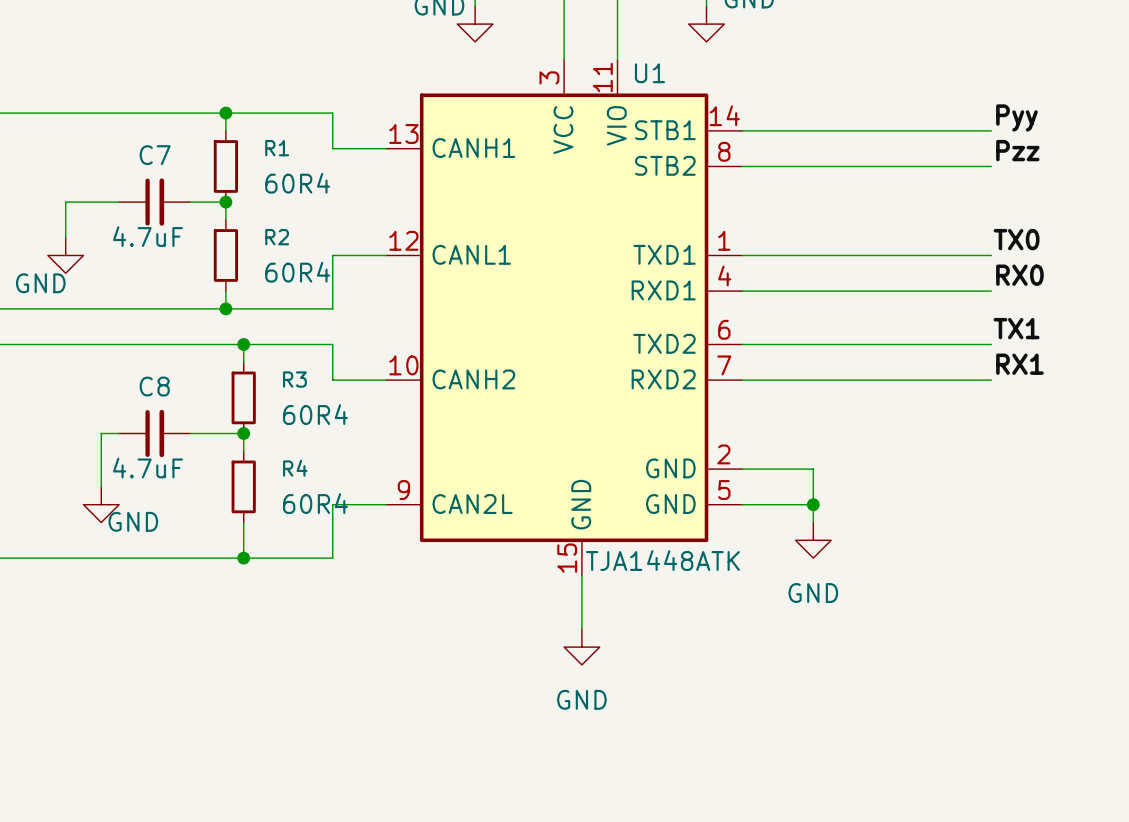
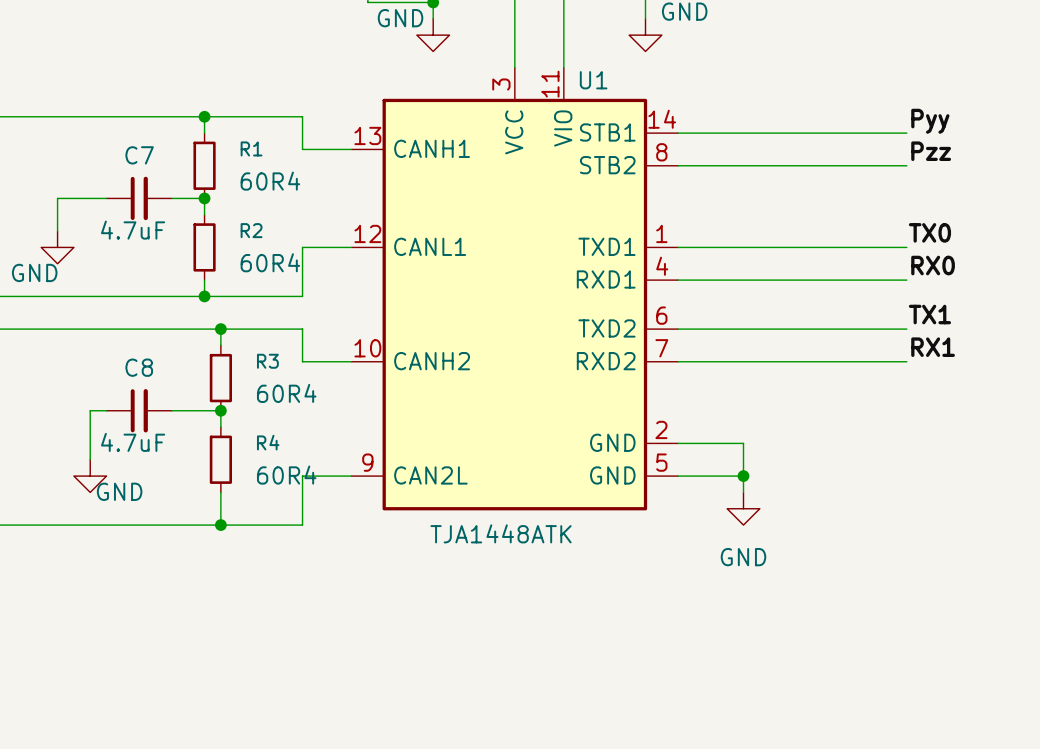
U1 symbol: [386, 59, 743, 576] -> [351, 67, 679, 511]
U1 value position: TJA1448ATK (662, 560) -> TJA1448ATK (501, 533)
wire: (581, 575) (581, 629) -> none
power symbol: GND (581, 647) -> none

